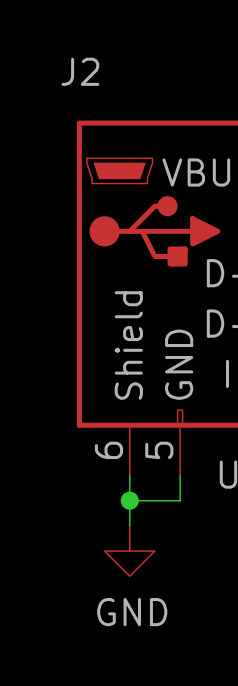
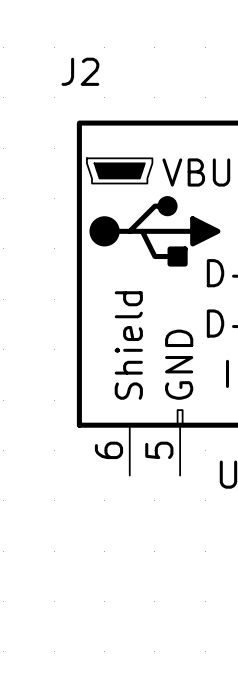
wire: (129, 475) (129, 525) -> none
wire: (180, 475) (180, 500) (129, 500) -> none
junction: (129, 500) -> none
power symbol: GND (129, 551) -> none

